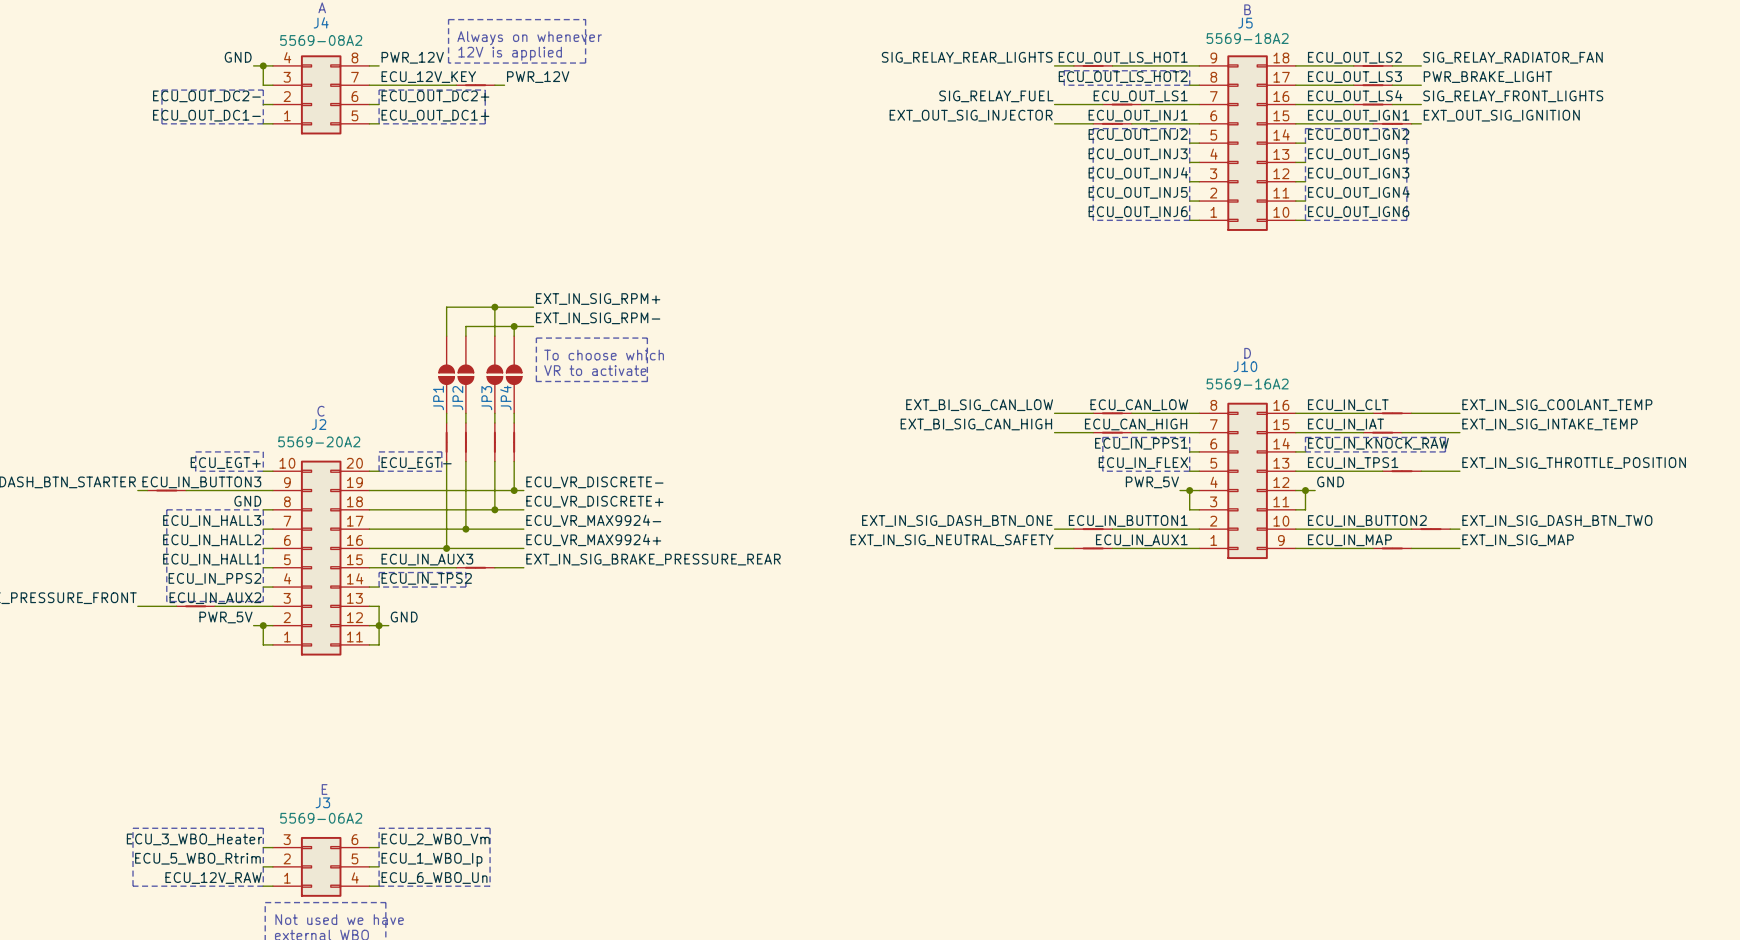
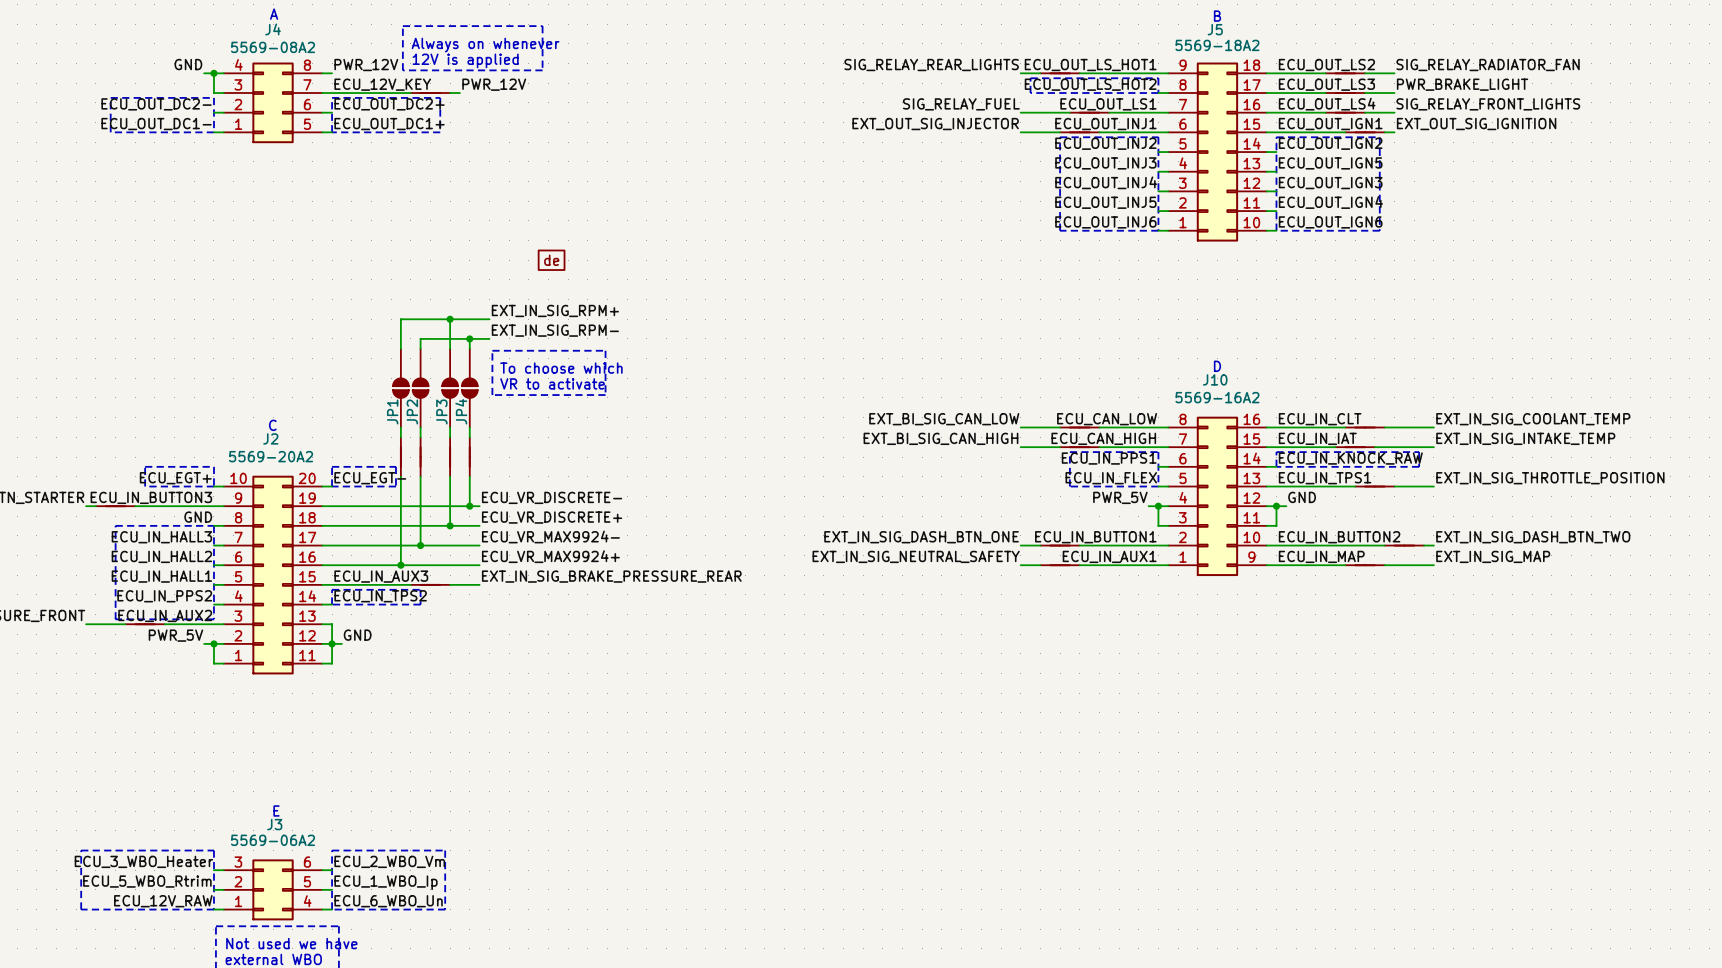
global label: none -> de (551, 260)

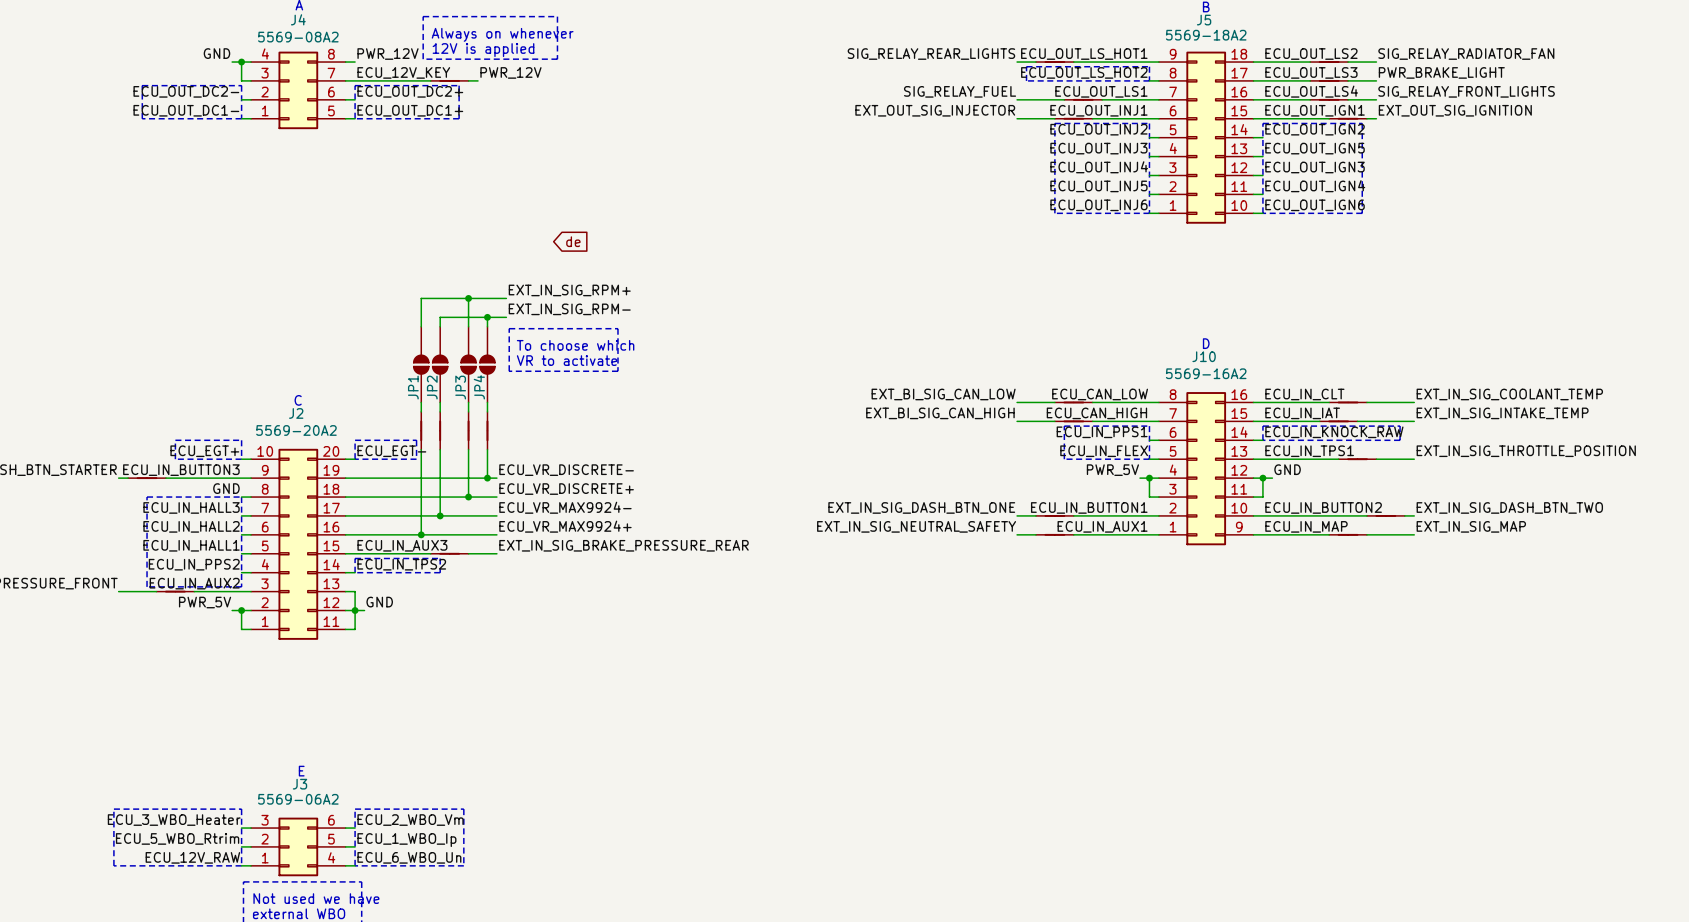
global label shape: passive (551, 260) -> input (573, 241)

